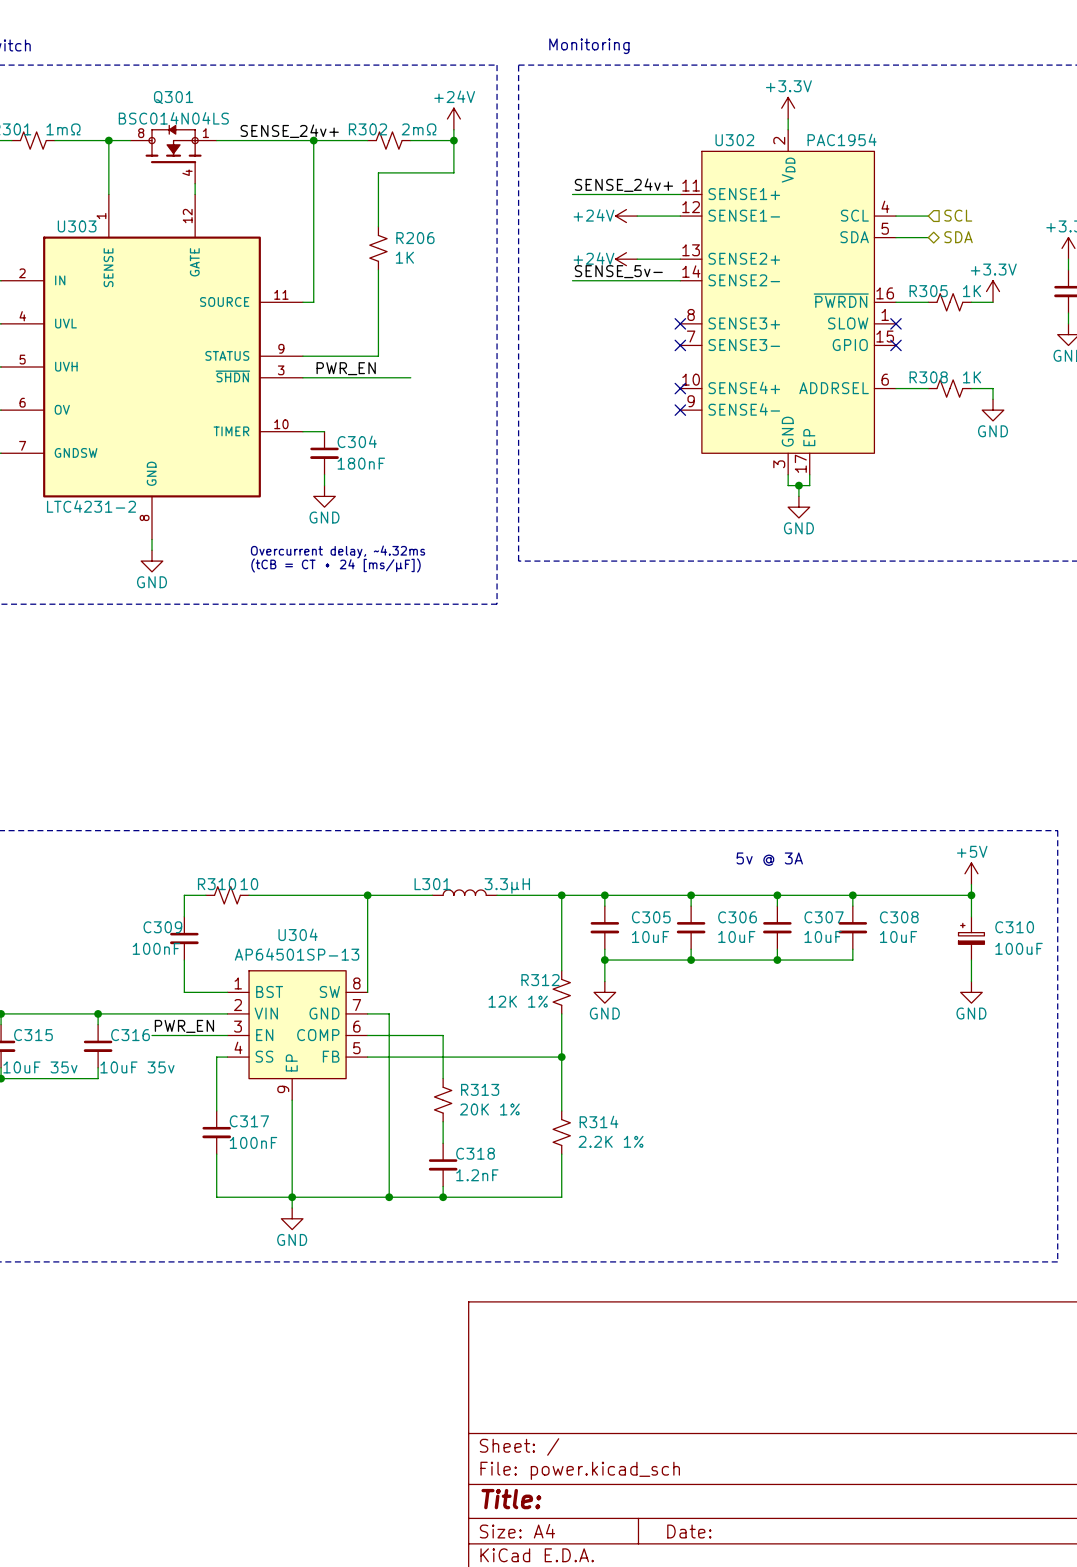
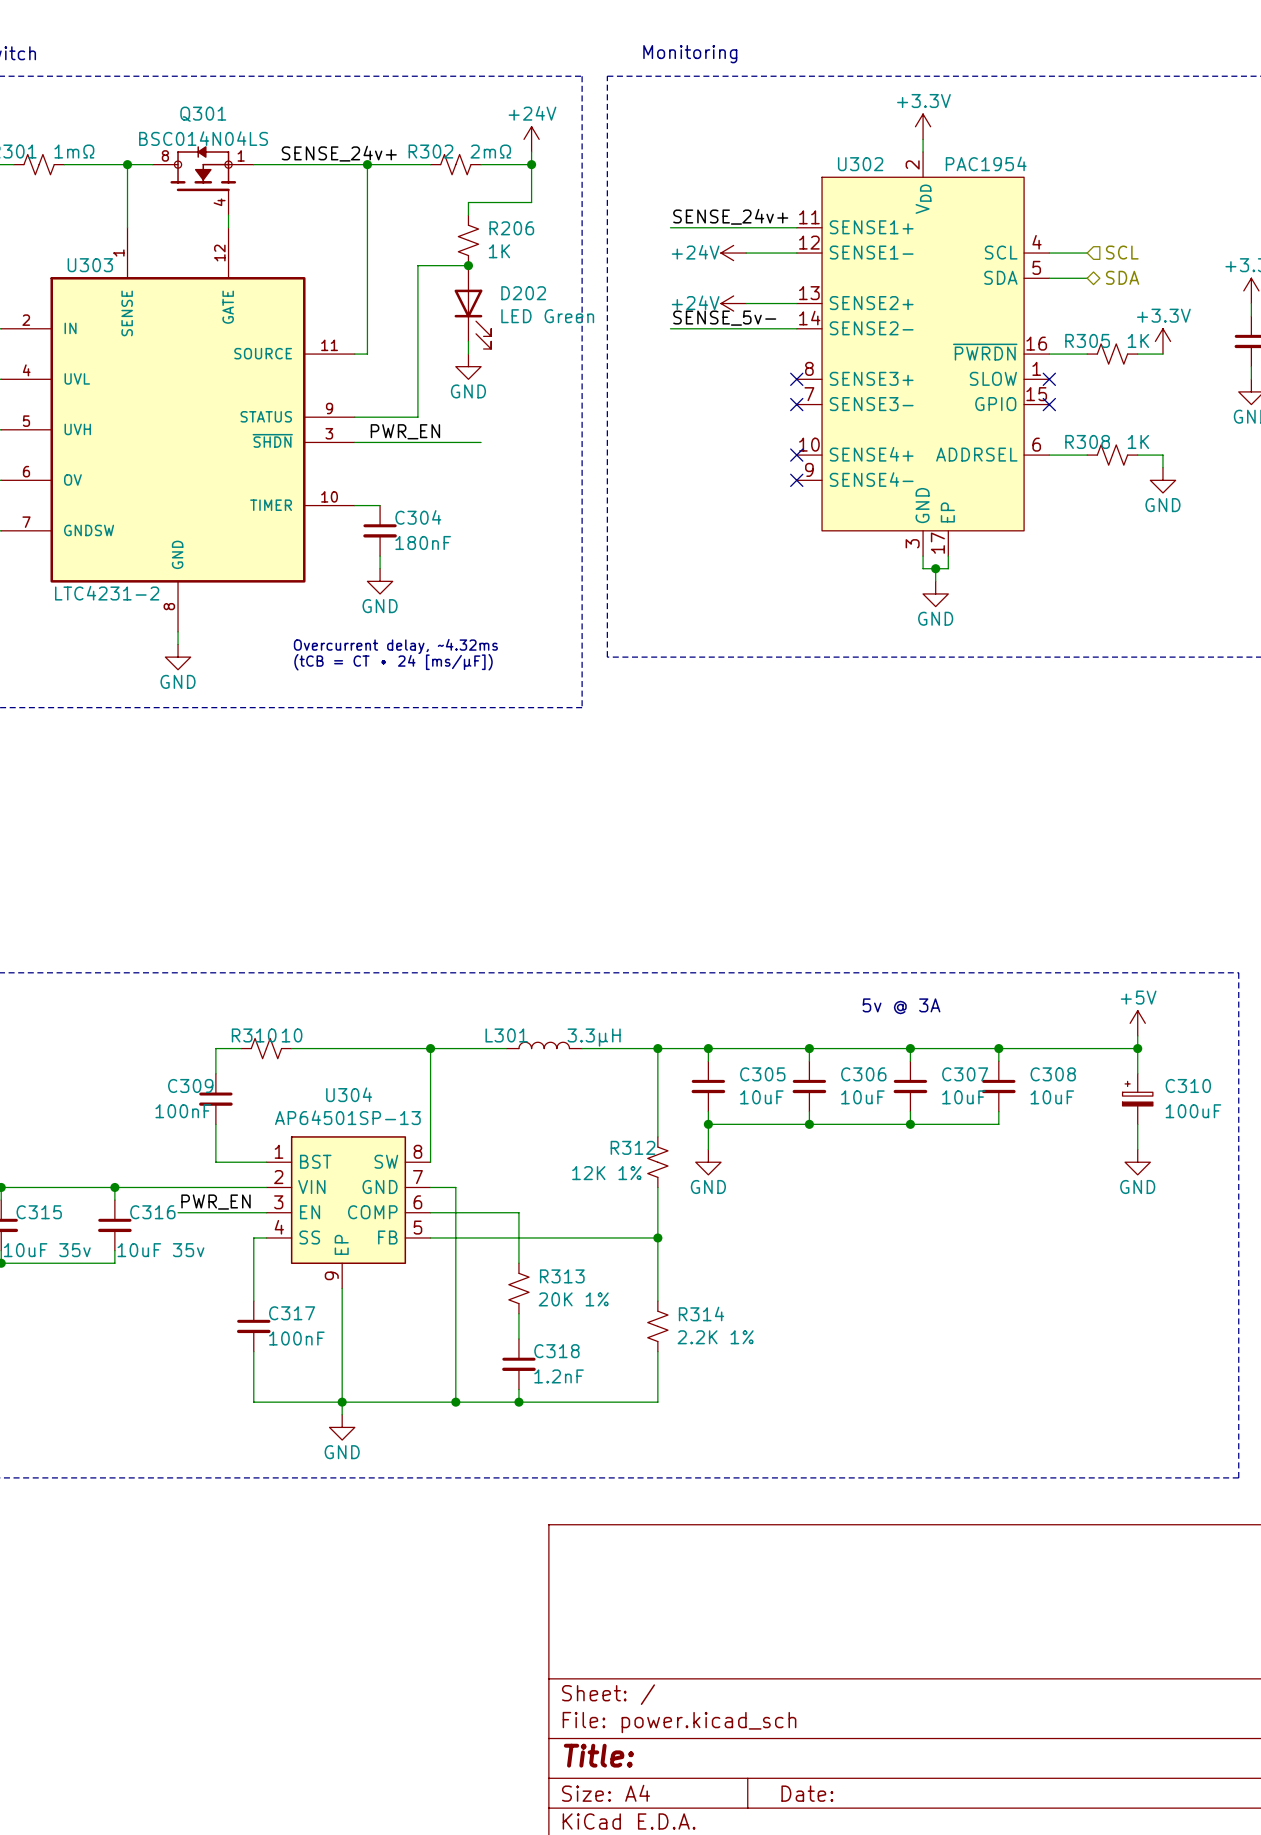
wire: (399, 172) (378, 172) (378, 226) -> (468, 202) (468, 215)
junction: none -> (468, 265)
R206 position: (378, 248) -> (468, 240)
D202: none -> LED Green (472, 307)
wire: (378, 269) (378, 356) (356, 356) -> (468, 265) (417, 265) (417, 417)
wire: none -> (468, 341) (468, 354)
power symbol: none -> GND (468, 366)

